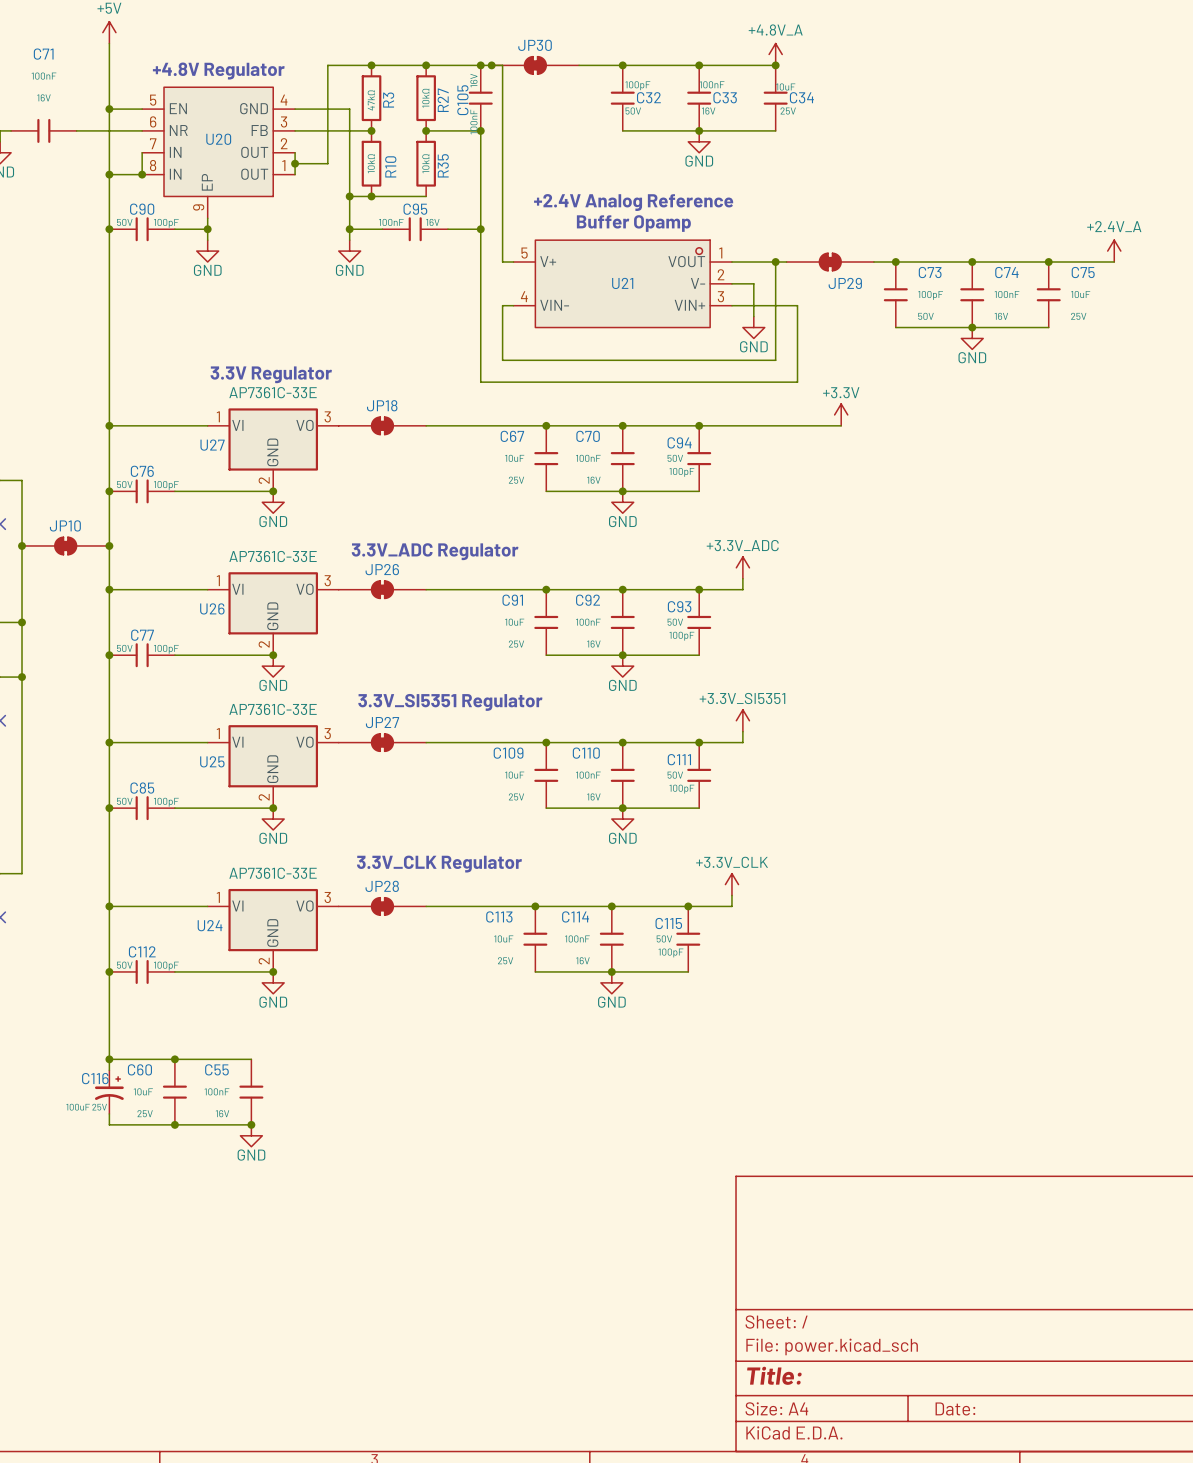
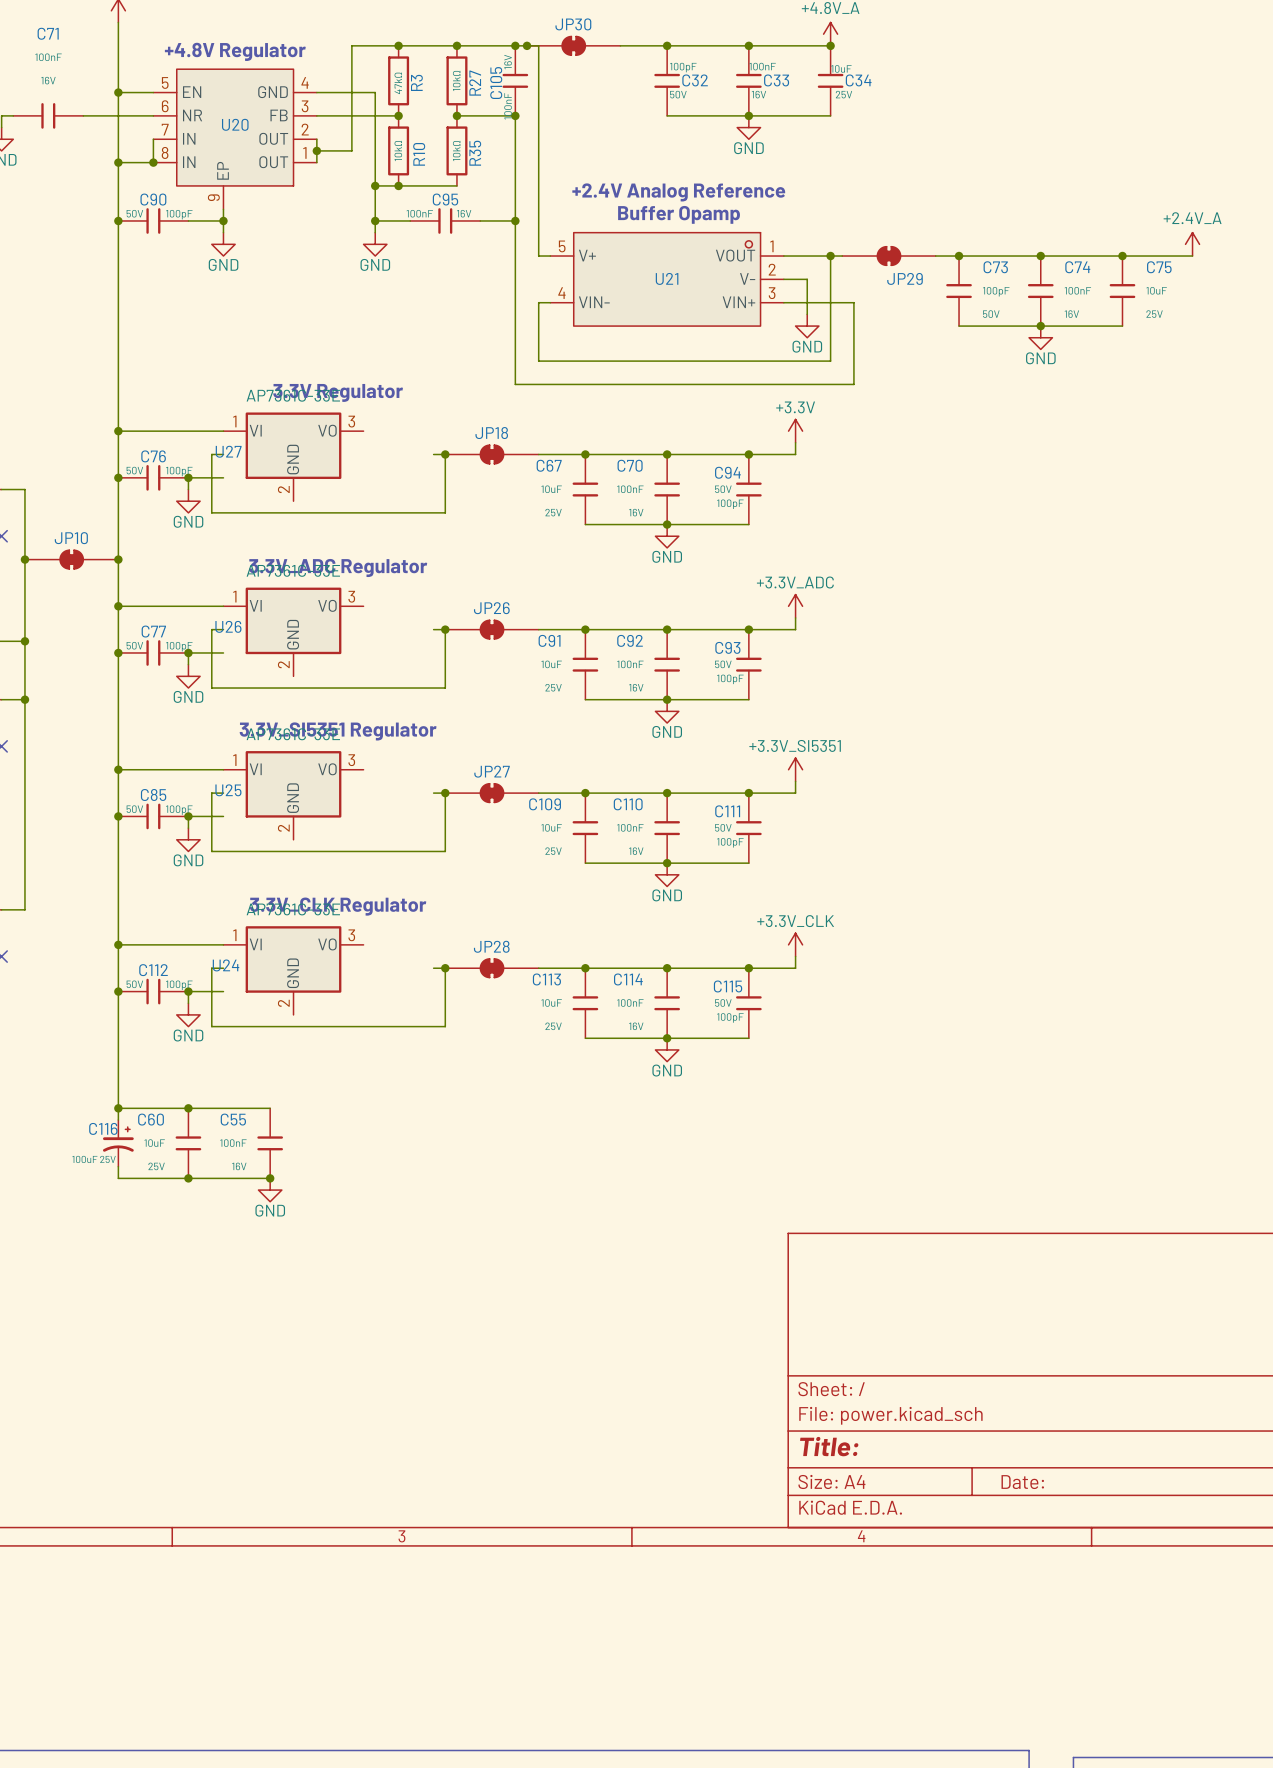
text position: 3.3V Regulator (271, 374) -> 3.3V Regulator (338, 392)
power symbol position: +3.3V (841, 414) -> +3.3V (795, 431)
JP18 position: (382, 425) -> (492, 454)
wire: (426, 425) (841, 425) -> none
junction position: (546, 425) -> (585, 454)
junction: (622, 425) -> none
junction position: (699, 425) -> (748, 454)
wire: none -> (795, 442) (795, 454) (538, 454)
wire: none -> (223, 454) (211, 454) (211, 512) (445, 512) (445, 454) (433, 454)
junction: none -> (445, 454)
junction: none -> (667, 454)
C67 position: (546, 458) -> (585, 489)
C70 position: (622, 458) -> (667, 489)
C94 position: (699, 458) -> (748, 489)
junction: none -> (188, 477)
wire: none -> (223, 477) (188, 477) (188, 489)
junction position: (109, 491) -> (118, 477)
C76 position: (142, 491) -> (153, 477)
wire: (174, 491) (273, 491) -> none
power symbol: none -> GND (188, 501)
junction: (273, 491) -> none
wire: (546, 491) (699, 491) -> (585, 524) (748, 524)
junction: (622, 491) -> none
power symbol: GND (273, 502) -> none
power symbol position: GND (622, 502) -> GND (667, 536)
junction: none -> (667, 524)
text position: 3.3V_ADC Regulator (435, 551) -> 3.3V_ADC Regulator (338, 567)
power symbol position: +3.3V_ADC (742, 567) -> +3.3V_ADC (795, 606)
wire: (742, 578) (742, 589) (426, 589) -> none
JP26 position: (382, 589) -> (492, 629)
junction position: (546, 589) -> (585, 629)
junction: (622, 589) -> none
junction position: (699, 589) -> (748, 629)
wire: none -> (795, 617) (795, 629) (538, 629)
wire: none -> (223, 629) (211, 629) (211, 688) (445, 688) (445, 629) (433, 629)
junction: none -> (445, 629)
junction: none -> (667, 629)
C91 position: (546, 622) -> (585, 664)
C92 position: (622, 622) -> (667, 664)
C93 position: (699, 622) -> (748, 664)
junction: none -> (188, 652)
wire: none -> (223, 652) (188, 652) (188, 664)
junction position: (109, 655) -> (118, 652)
C77 position: (142, 655) -> (153, 652)
wire: (174, 655) (273, 655) -> none
power symbol: none -> GND (188, 676)
junction: (273, 655) -> none
wire: (546, 655) (699, 655) -> (585, 699) (748, 699)
junction: (622, 655) -> none
power symbol: GND (273, 666) -> none
power symbol position: GND (622, 666) -> GND (667, 711)
junction: none -> (667, 699)
text position: 3.3V_SI5351 Regulator (450, 702) -> 3.3V_SI5351 Regulator (338, 731)
power symbol position: +3.3V_SI5351 (742, 720) -> +3.3V_SI5351 (795, 769)
wire: (742, 731) (742, 742) (426, 742) -> none
JP27 position: (382, 742) -> (492, 793)
junction position: (546, 742) -> (585, 793)
junction: (622, 742) -> none
junction position: (699, 742) -> (748, 793)
wire: none -> (795, 781) (795, 793) (538, 793)
wire: none -> (223, 793) (211, 793) (211, 851) (445, 851) (445, 793) (433, 793)
junction: none -> (445, 793)
junction: none -> (667, 793)
C109 position: (546, 775) -> (585, 828)
C110 position: (622, 775) -> (667, 828)
C111 position: (699, 775) -> (748, 828)
junction: none -> (188, 816)
wire: none -> (223, 816) (188, 816) (188, 828)
junction position: (109, 808) -> (118, 816)
C85 position: (142, 808) -> (153, 816)
wire: (174, 808) (273, 808) -> none
power symbol: none -> GND (188, 839)
junction: (273, 808) -> none
wire: (546, 808) (699, 808) -> (585, 863) (748, 863)
junction: (622, 808) -> none
power symbol: GND (273, 819) -> none
power symbol position: GND (622, 819) -> GND (667, 874)
junction: none -> (667, 863)
text position: 3.3V_CLK Regulator (439, 864) -> 3.3V_CLK Regulator (338, 906)
power symbol position: +3.3V_CLK (731, 884) -> +3.3V_CLK (795, 944)
wire: (731, 895) (731, 906) (426, 906) -> none
JP28 position: (382, 906) -> (492, 968)
junction position: (535, 906) -> (585, 968)
junction: (611, 906) -> none
junction position: (688, 906) -> (748, 968)
wire: none -> (795, 956) (795, 968) (538, 968)
wire: none -> (223, 968) (211, 968) (211, 1026) (445, 1026) (445, 968) (433, 968)
junction: none -> (445, 968)
junction: none -> (667, 968)
C113 position: (535, 939) -> (585, 1003)
C114 position: (611, 939) -> (667, 1003)
C115 position: (688, 939) -> (748, 1003)
junction: none -> (188, 991)
wire: none -> (223, 991) (188, 991) (188, 1003)
junction position: (109, 971) -> (118, 991)
C112 position: (142, 971) -> (153, 991)
wire: (174, 971) (273, 971) -> none
power symbol: none -> GND (188, 1014)
junction: (273, 971) -> none
wire: (535, 971) (688, 971) -> (585, 1038) (748, 1038)
junction: (611, 971) -> none
power symbol: GND (273, 982) -> none
power symbol position: GND (611, 982) -> GND (667, 1049)
junction: none -> (667, 1038)

